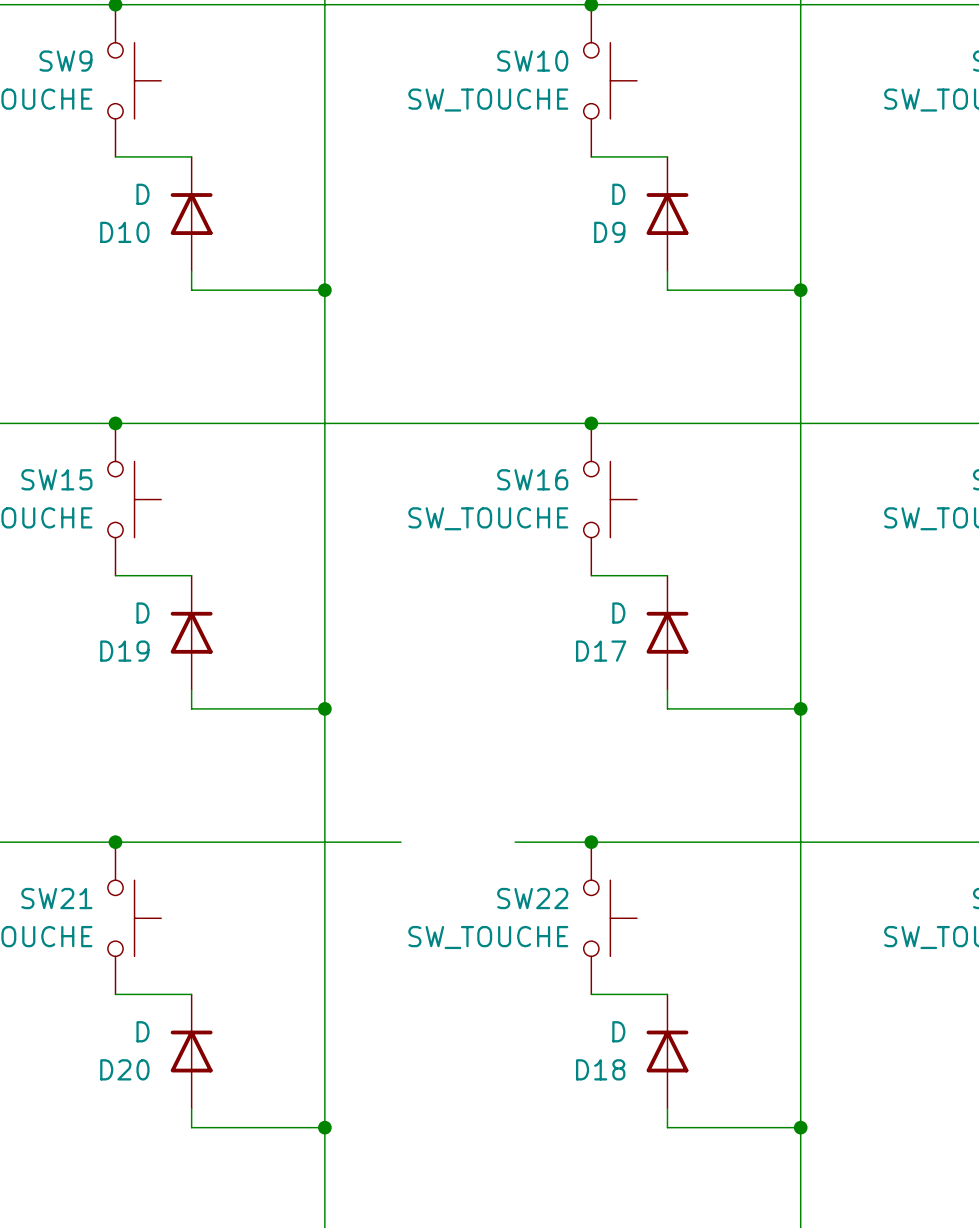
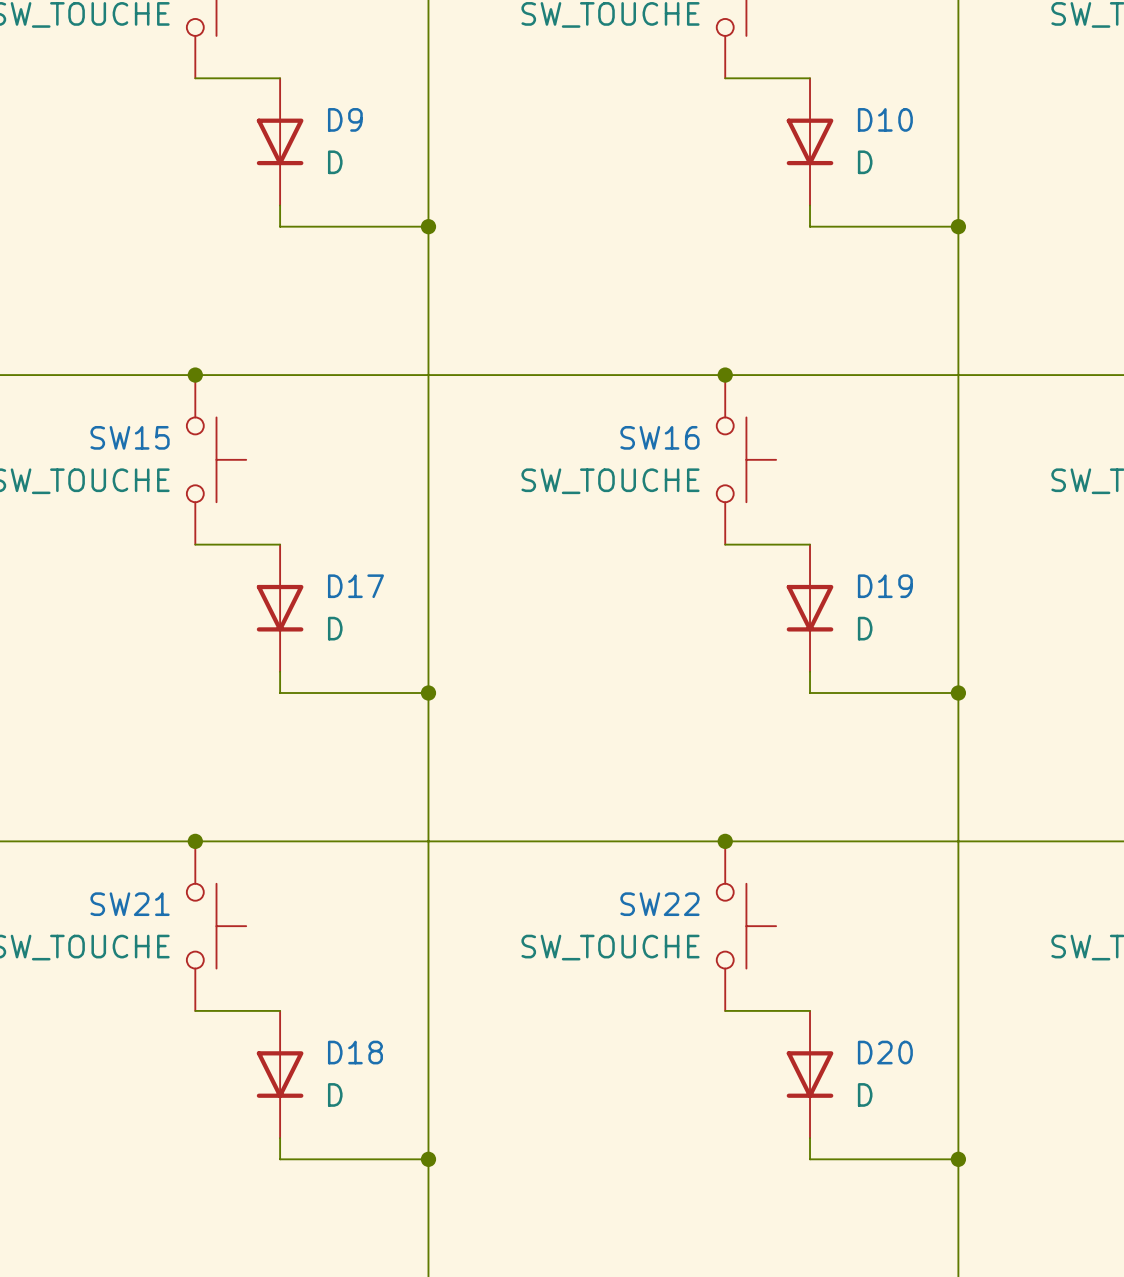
D10 rotation: 0° (191, 214) -> 180° (810, 141)
D10 position: (191, 214) -> (810, 141)
D9 rotation: 0° (667, 214) -> 180° (280, 141)
D9 position: (667, 214) -> (280, 141)
D19 rotation: 0° (191, 632) -> 180° (810, 608)
D19 position: (191, 632) -> (810, 608)
D17 rotation: 0° (667, 632) -> 180° (280, 608)
D17 position: (667, 632) -> (280, 608)
wire: none -> (513, 841) (640, 841)
D20 rotation: 0° (191, 1051) -> 180° (810, 1074)
D20 position: (191, 1051) -> (810, 1074)
D18 rotation: 0° (667, 1051) -> 180° (280, 1074)
D18 position: (667, 1051) -> (280, 1074)

